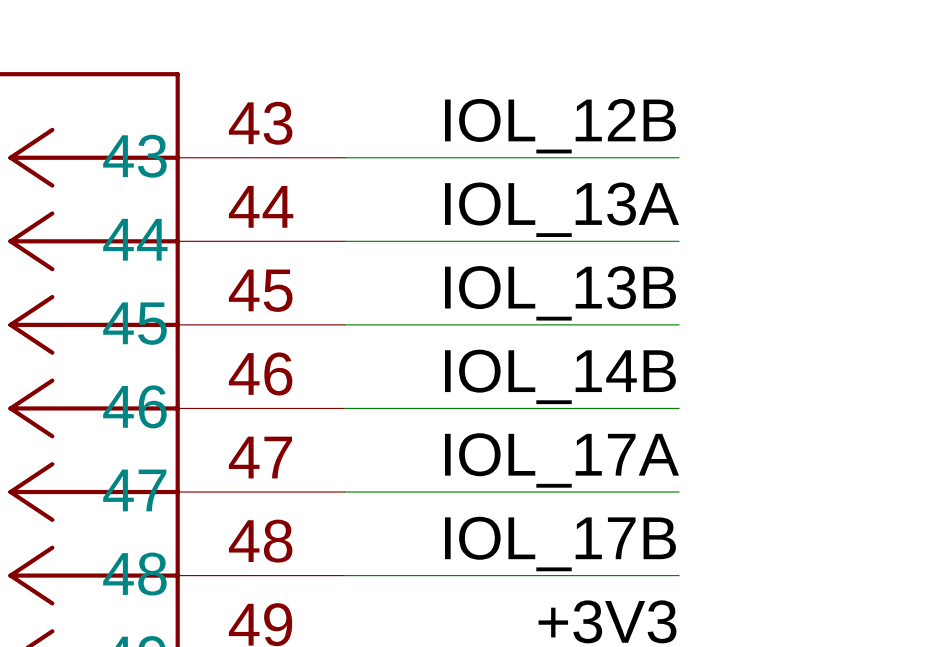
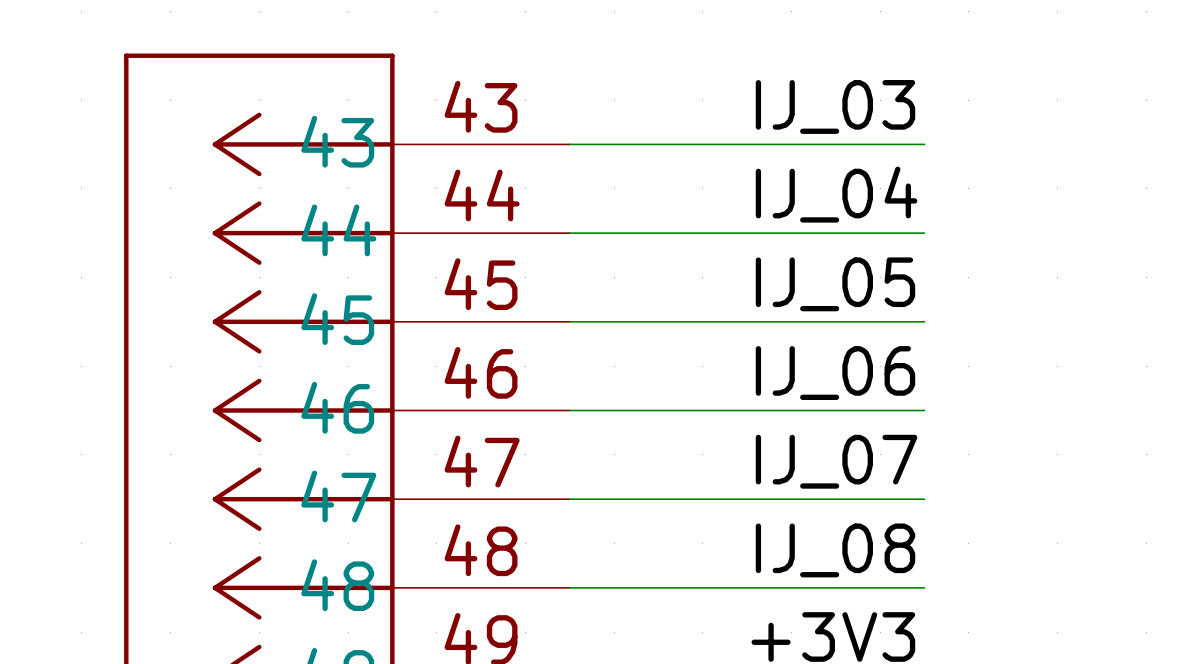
label: IOL_12B (560, 126) -> IJ_03 (835, 106)
label: IOL_13A (561, 209) -> IJ_04 (836, 194)
label: IOL_13B (560, 293) -> IJ_05 (835, 284)
label: IOL_14B (560, 376) -> IJ_06 (835, 373)
label: IOL_17A (561, 460) -> IJ_07 (836, 461)
label: IOL_17B (560, 544) -> IJ_08 (835, 550)

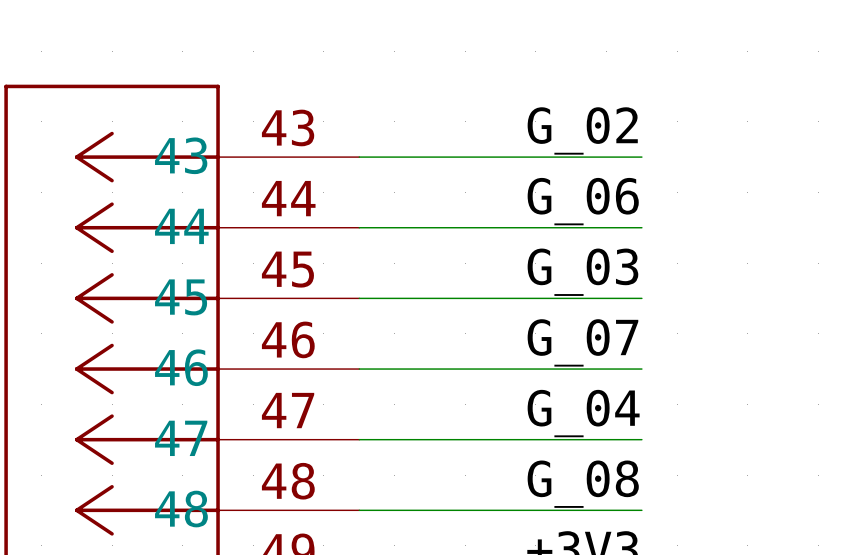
label: IJ_03 (835, 106) -> G_02 (582, 130)
label: IJ_04 (836, 194) -> G_06 (583, 201)
label: IJ_05 (835, 284) -> G_03 (582, 272)
label: IJ_06 (835, 373) -> G_07 (582, 342)
label: IJ_07 (836, 461) -> G_04 (583, 413)
label: IJ_08 (835, 550) -> G_08 (583, 484)

